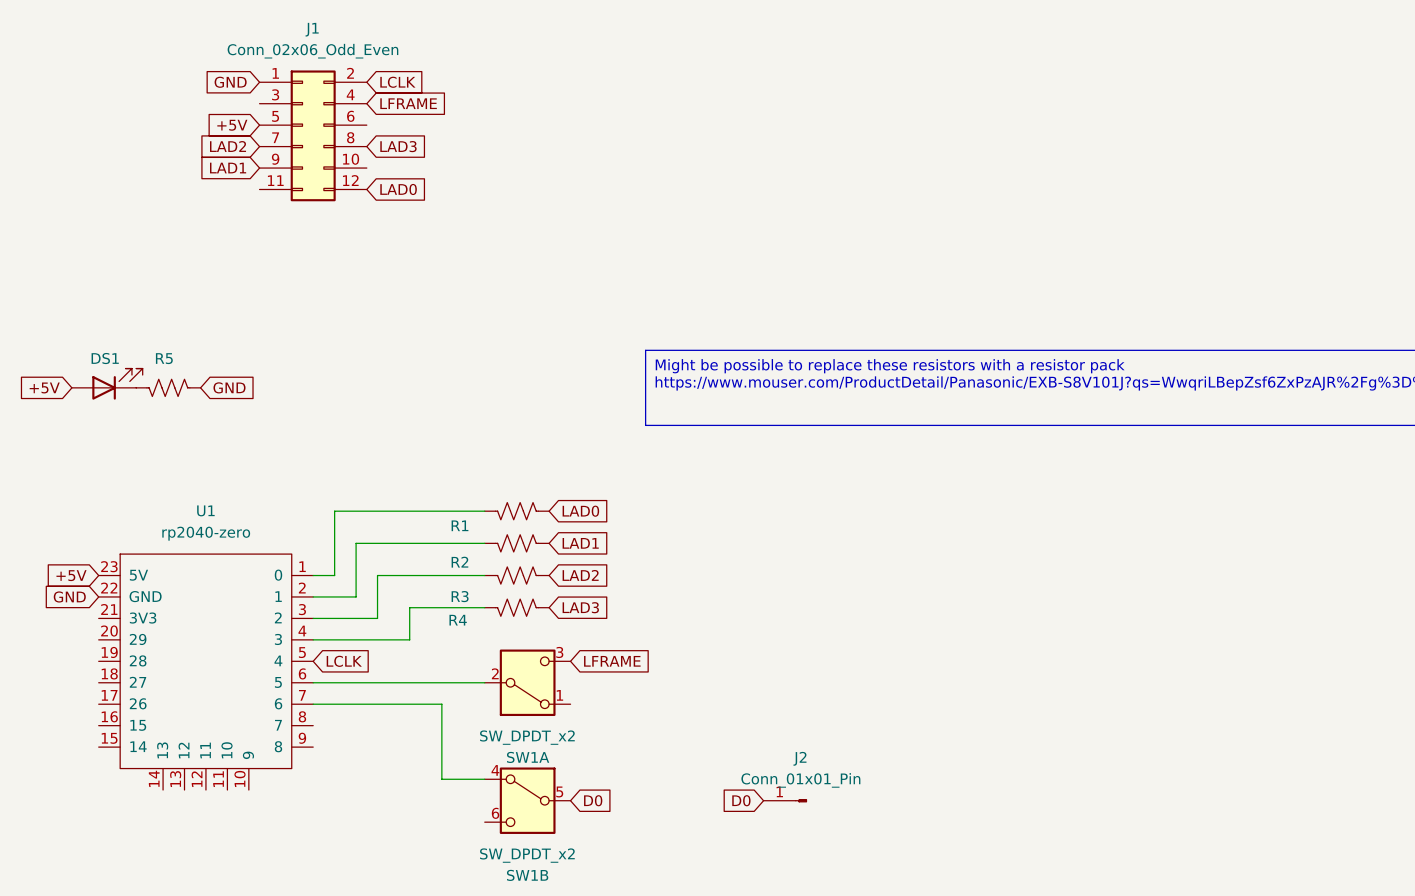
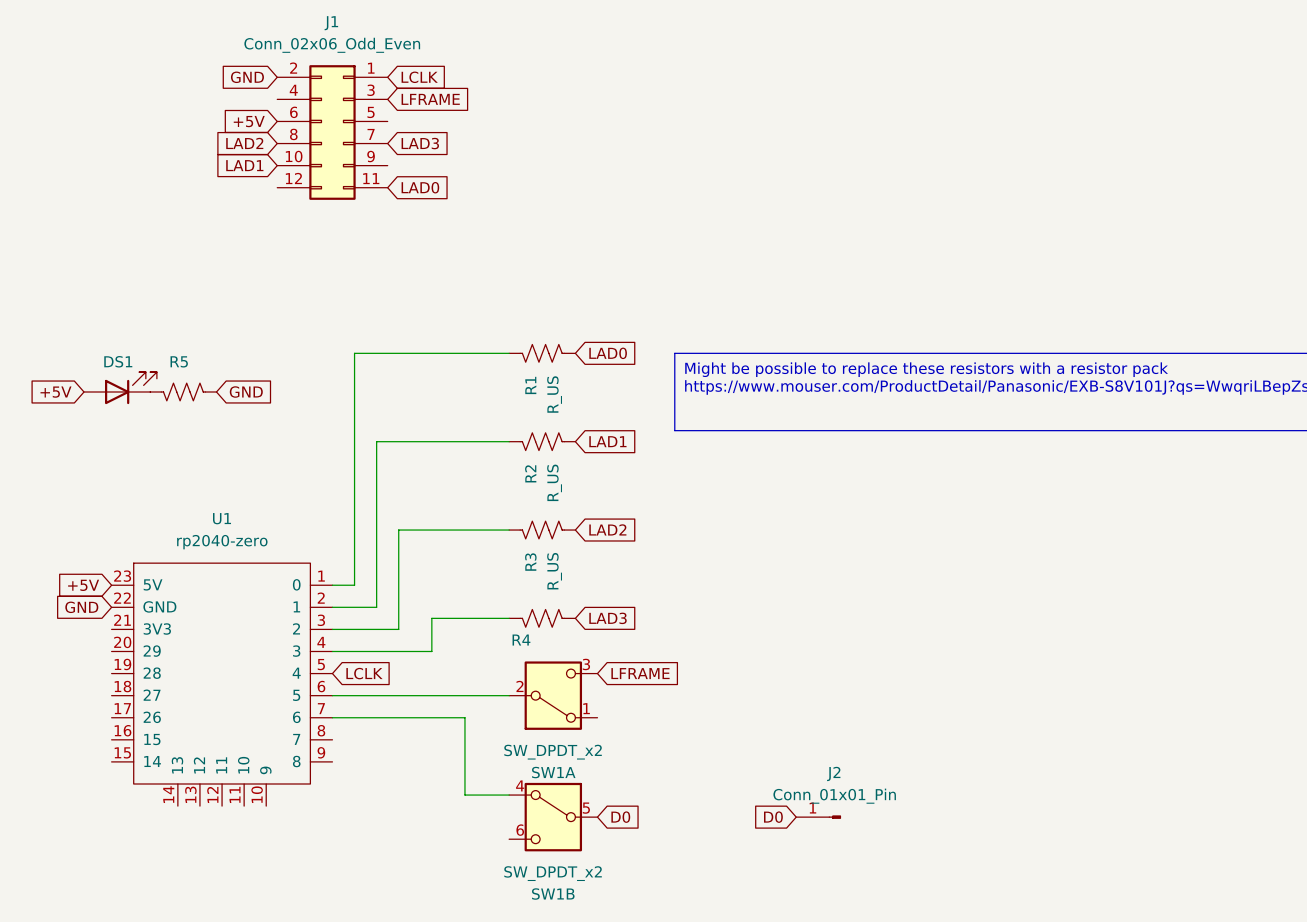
J1 flip: as is (313, 135) -> left-right (332, 132)
R1 value: none -> R_US (554, 394)
R2 value: none -> R_US (554, 482)
wire: (334, 511) (484, 511) -> (354, 518) (354, 353) (509, 353)
R1 position: (516, 511) -> (542, 353)
global label position: LAD0 (580, 511) -> LAD0 (608, 353)
R1 name rotation: 0° (460, 525) -> 90° counterclockwise (530, 385)
R1 name position: R1 (460, 525) -> R1 (530, 385)
wire: (356, 543) (484, 543) -> (376, 552) (376, 441) (509, 441)
R2 position: (516, 543) -> (542, 441)
global label position: LAD1 (580, 543) -> LAD1 (607, 441)
R3 value: none -> R_US (554, 571)
R2 name rotation: 0° (459, 562) -> 90° counterclockwise (530, 473)
R2 name position: R2 (459, 562) -> R2 (530, 473)
wire: (377, 575) (484, 575) -> (398, 585) (398, 530) (509, 530)
R3 position: (516, 575) -> (542, 530)
global label position: LAD2 (580, 575) -> LAD2 (607, 529)
R3 name rotation: 0° (460, 596) -> 90° counterclockwise (530, 562)
R3 name position: R3 (460, 596) -> R3 (530, 562)
R4 name position: R4 (458, 620) -> R4 (521, 640)

